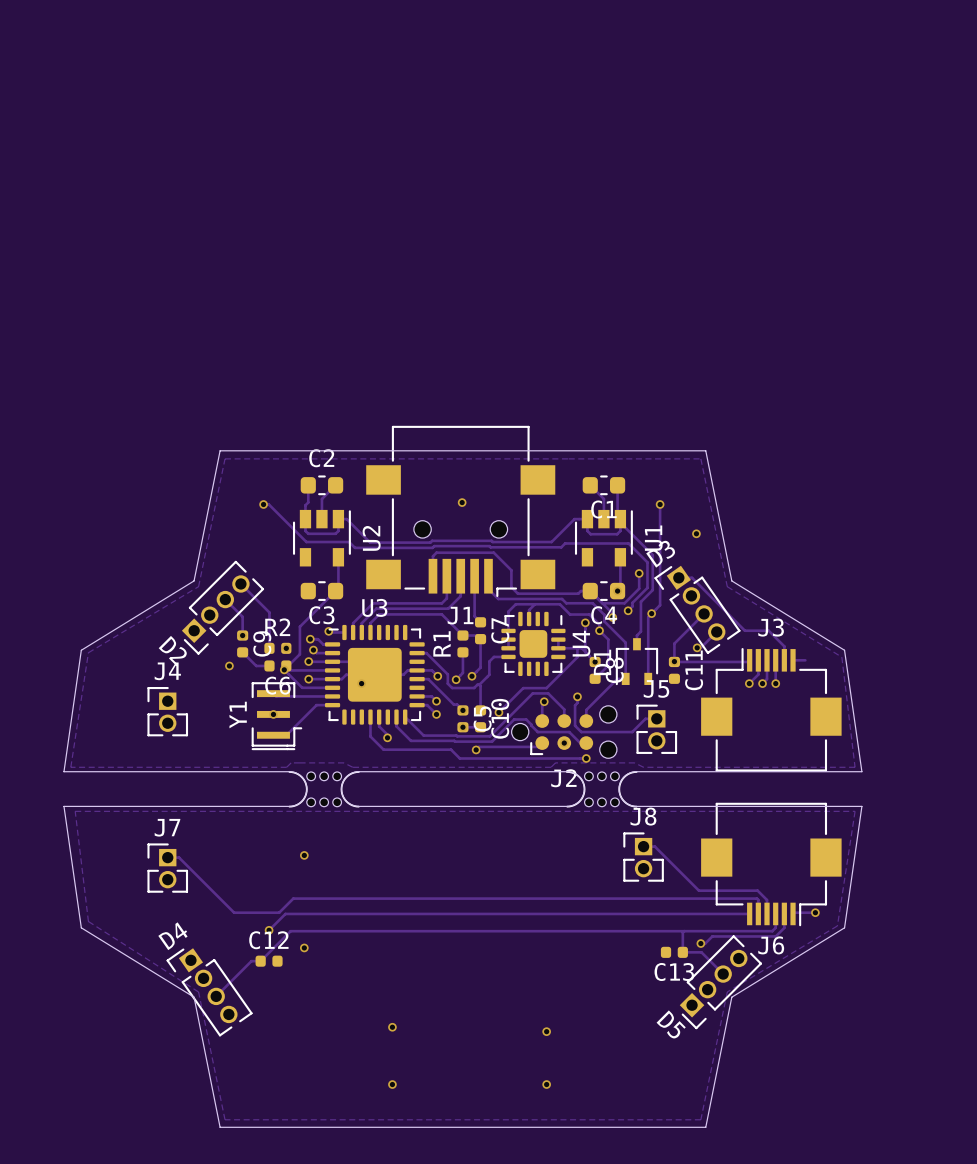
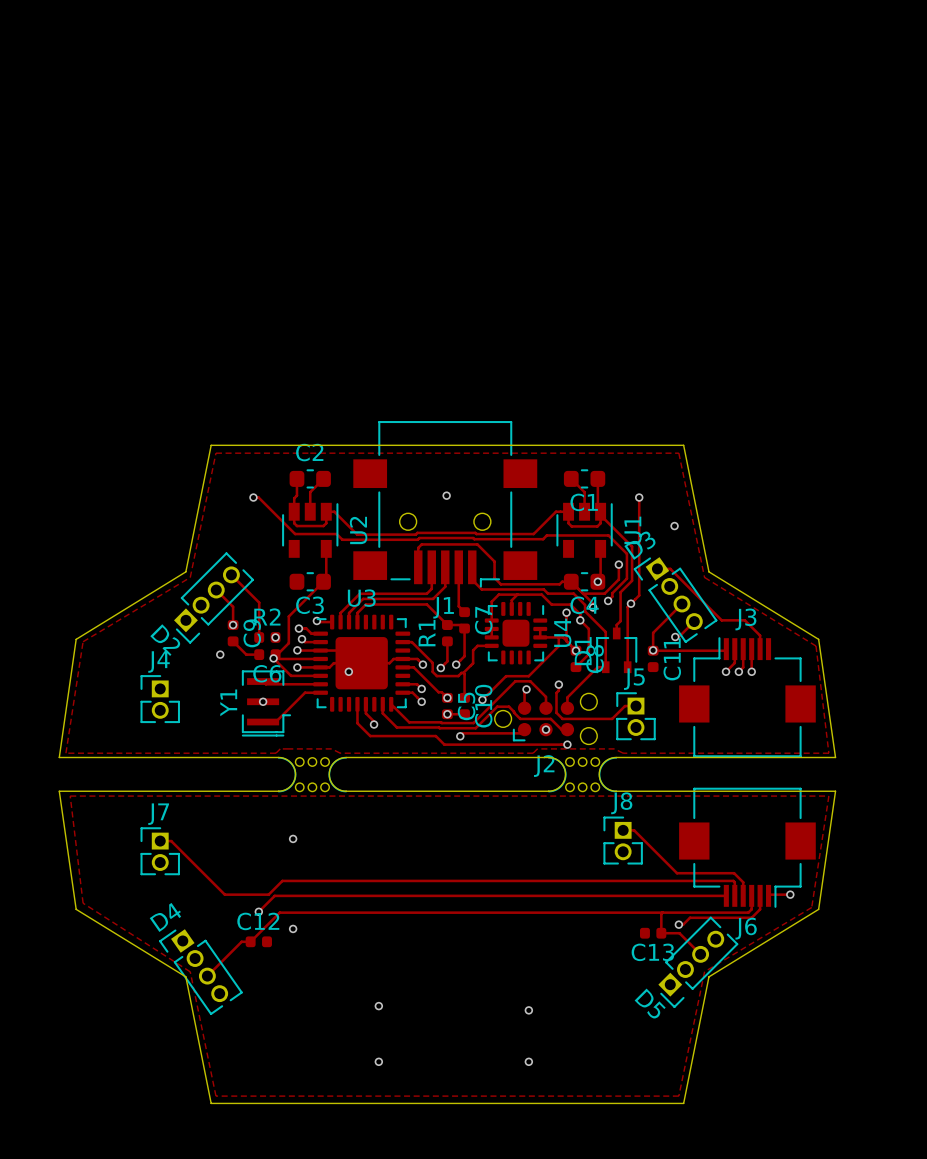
track: (793, 660) (805, 660) -> none

